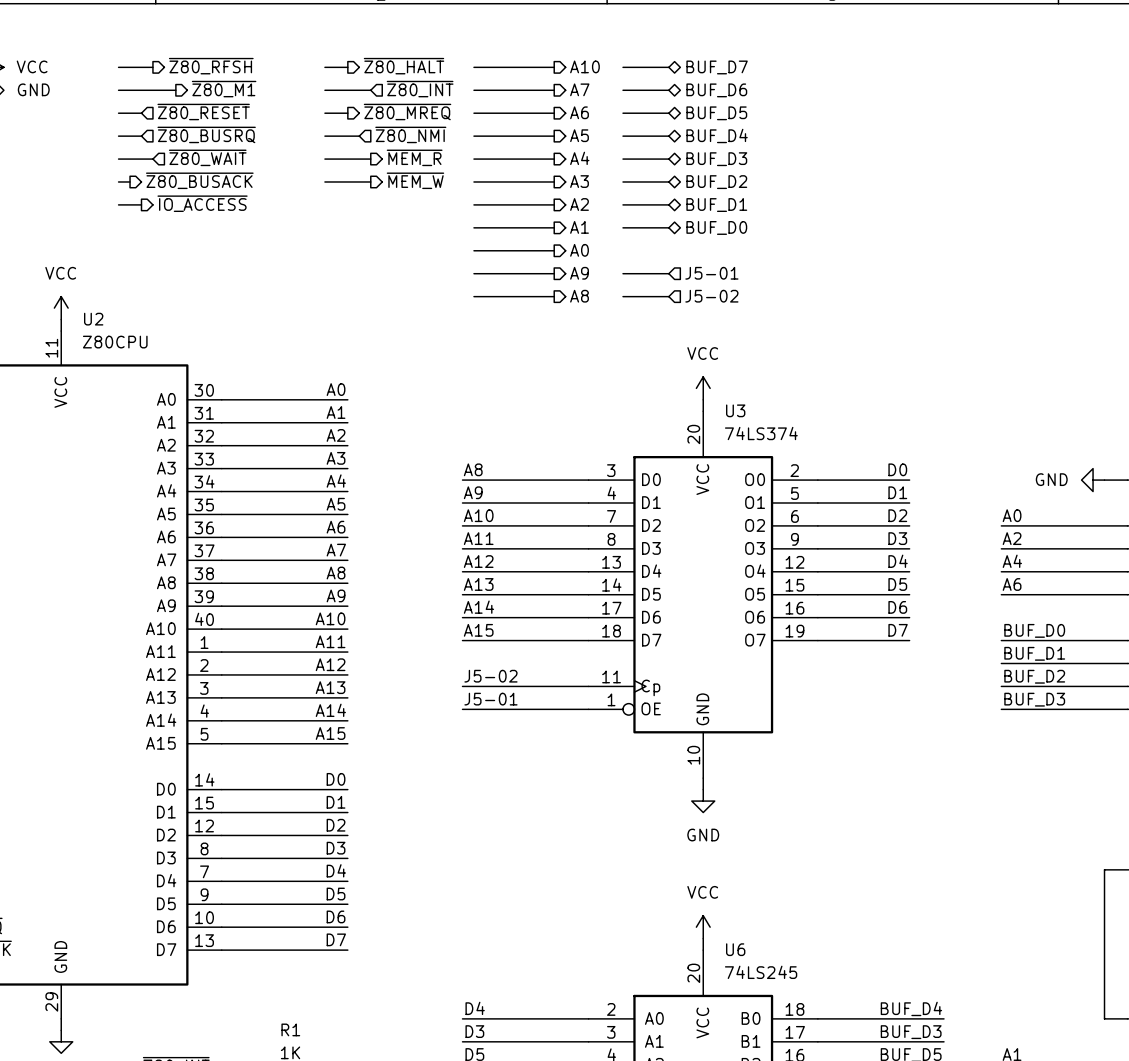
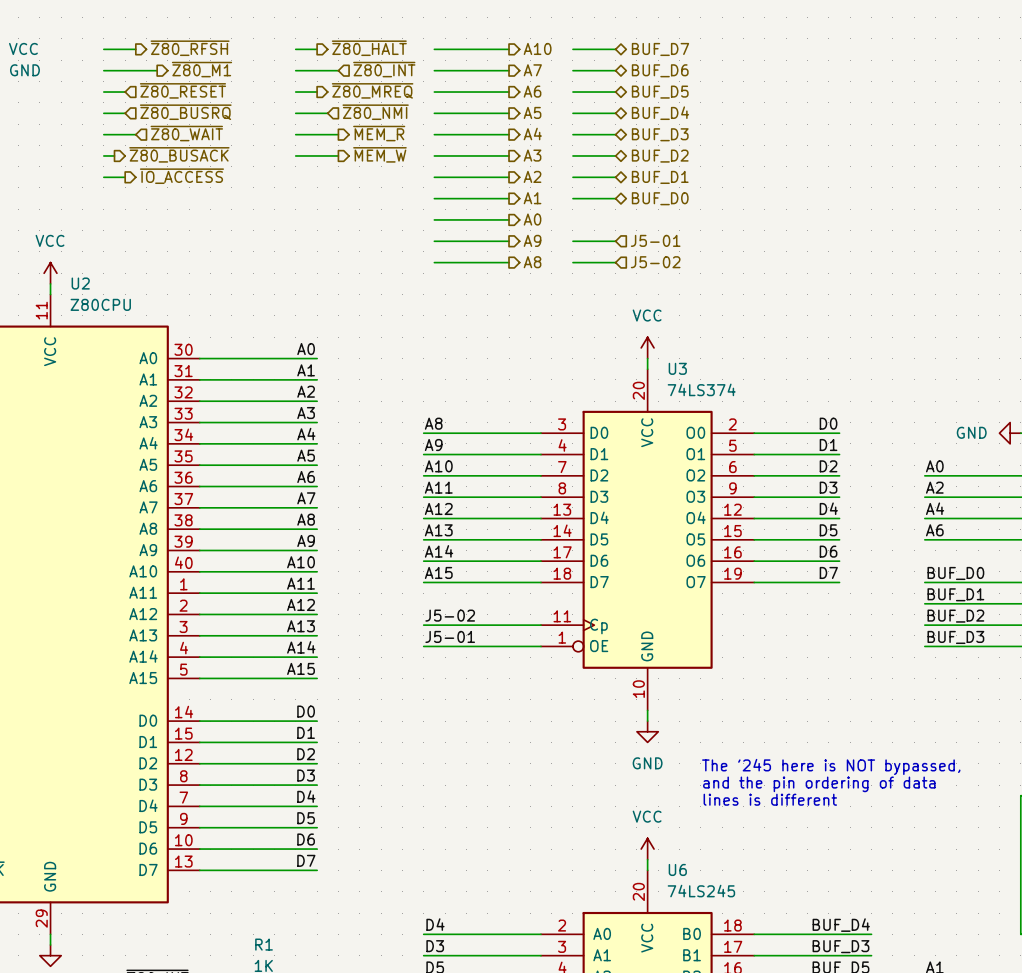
text: none -> The '245 here is NOT bypassed, (831, 766)
text: none -> and the pin ordering of data (819, 784)
text: none -> lines is different (770, 799)

